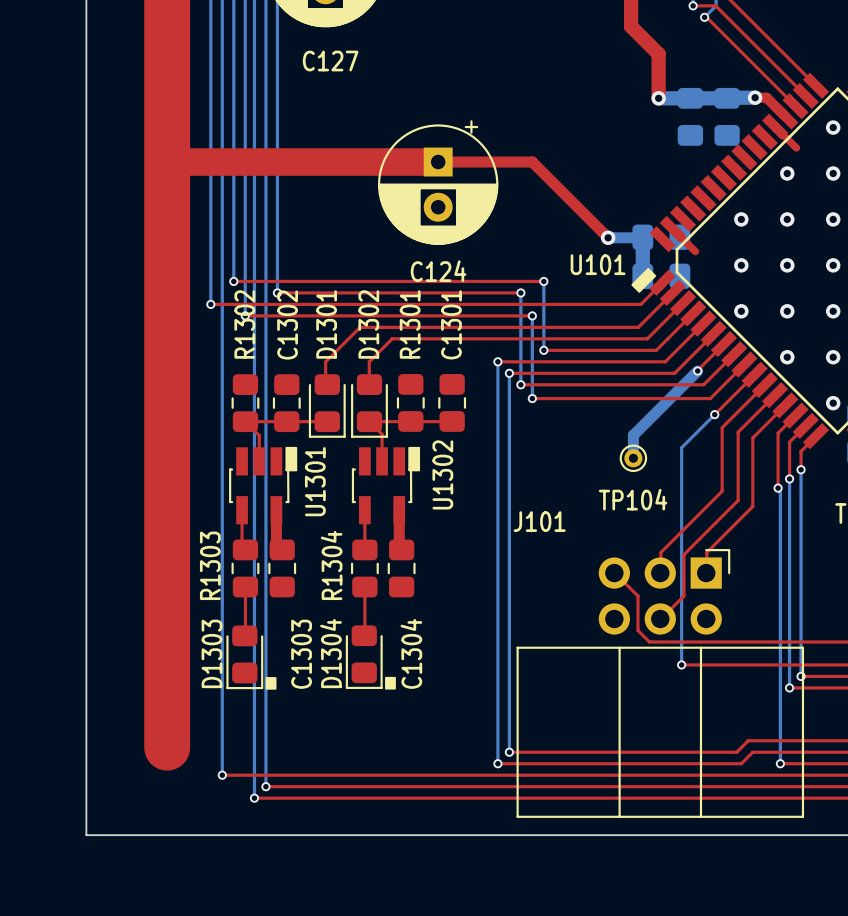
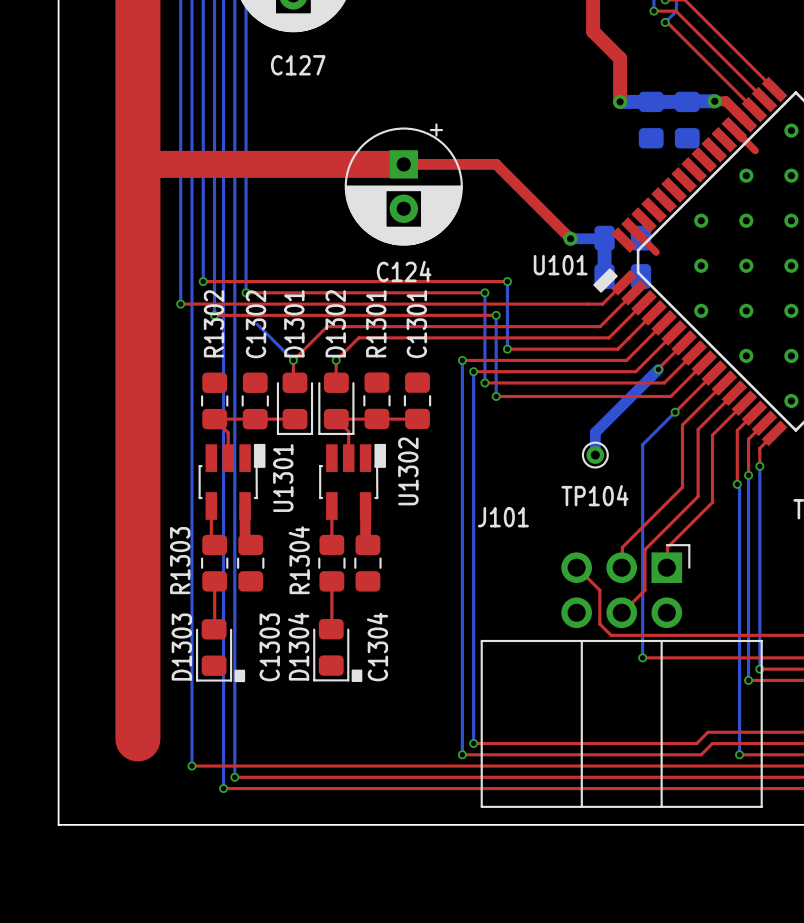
bottom track: none -> (257, 324) (293, 360)
via: none -> (293, 360)
via: none -> (336, 360)

